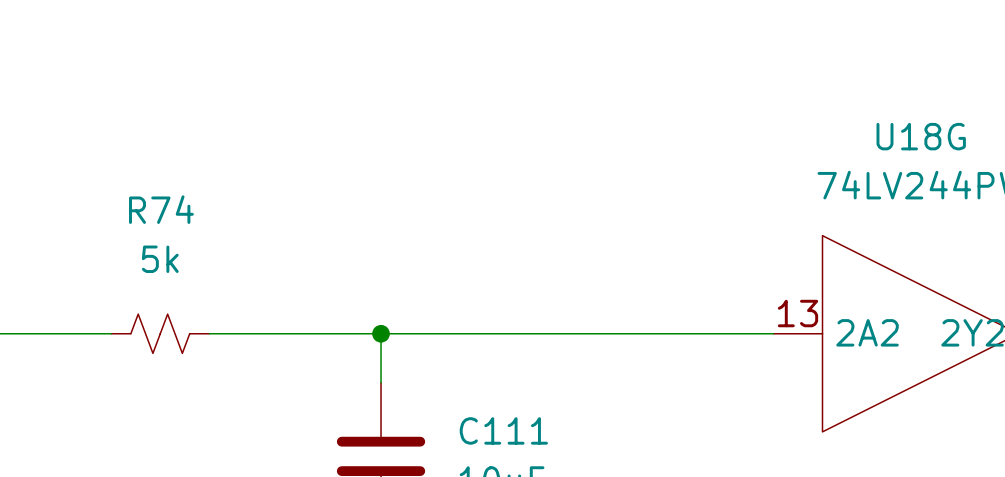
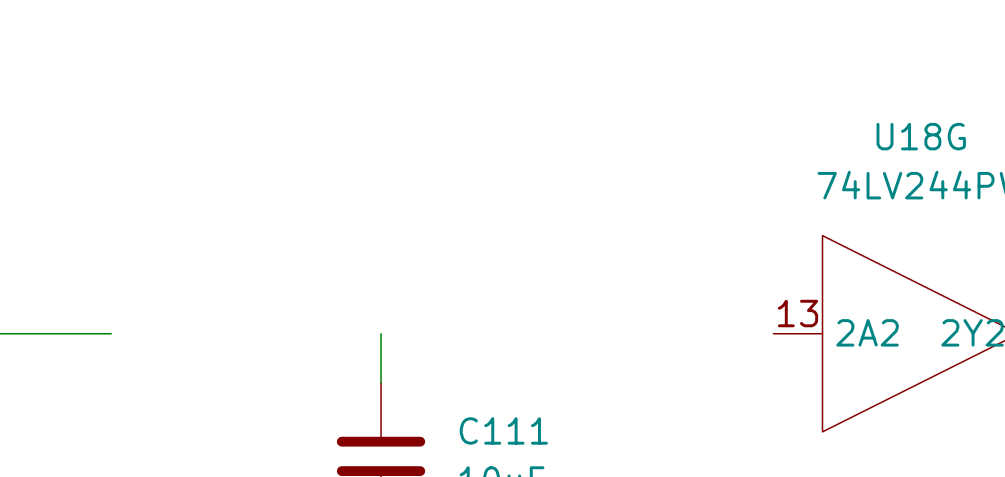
R74: 5k (160, 333) -> none
wire: (209, 333) (773, 333) -> none
junction: (381, 333) -> none

